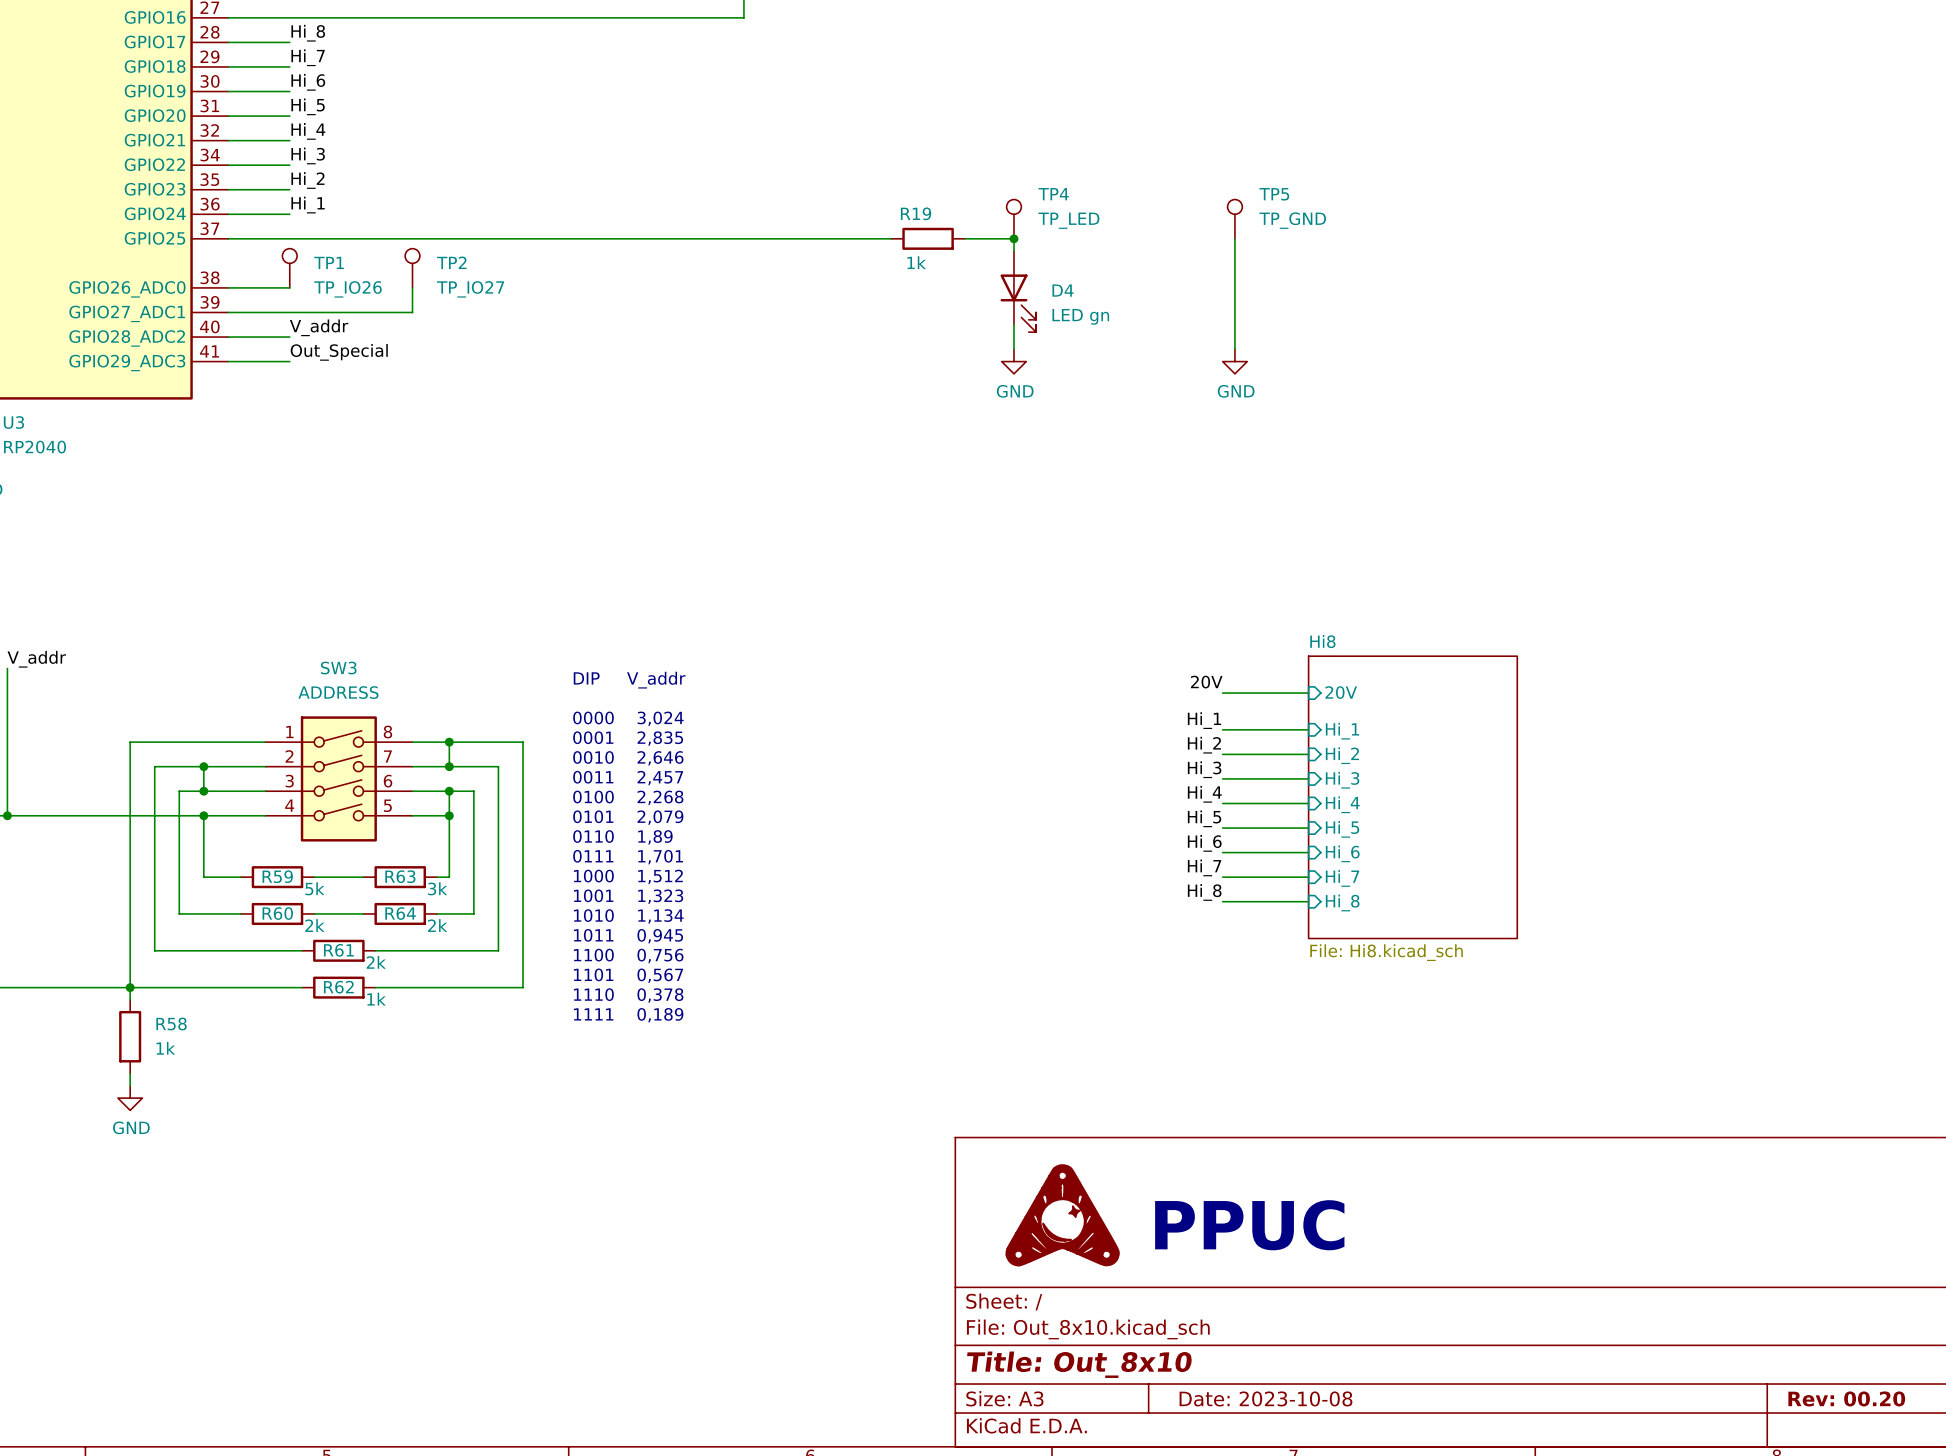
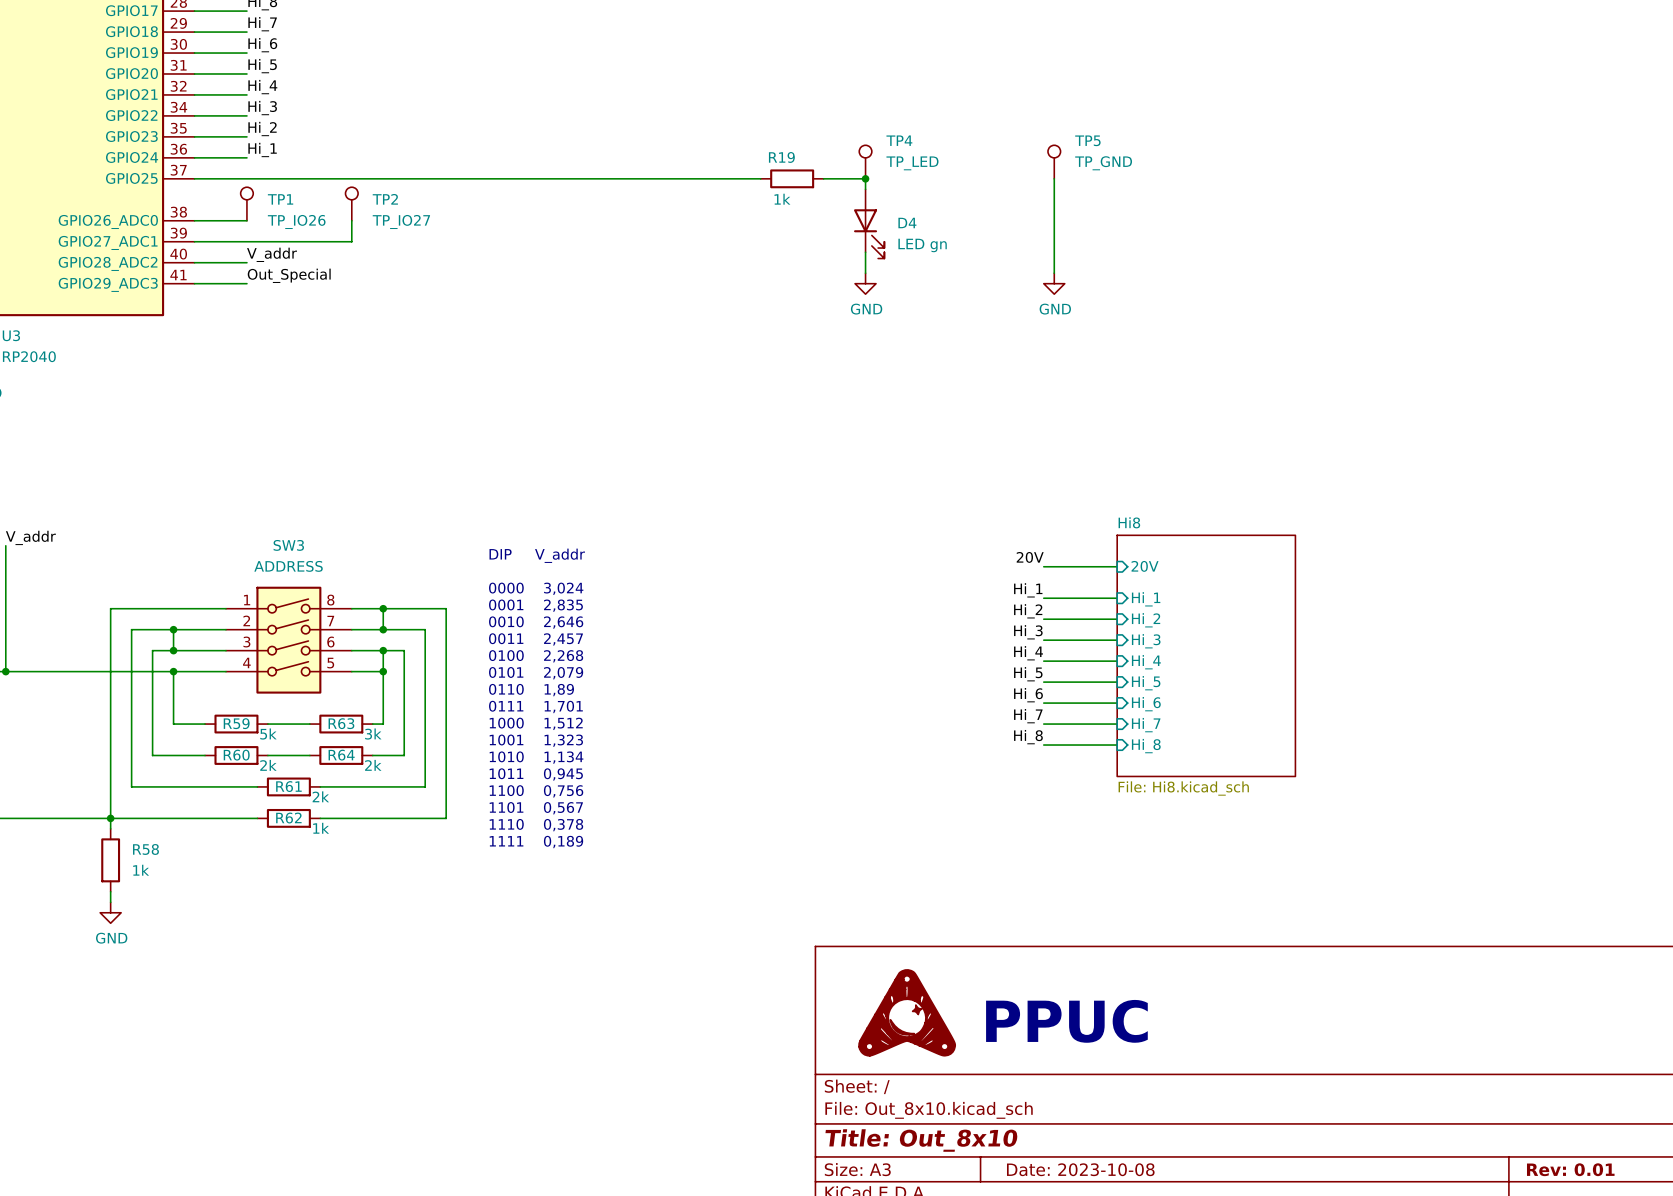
title block: Rev: 00.20 (1846, 1398) -> Rev: 0.01 (1570, 1169)

